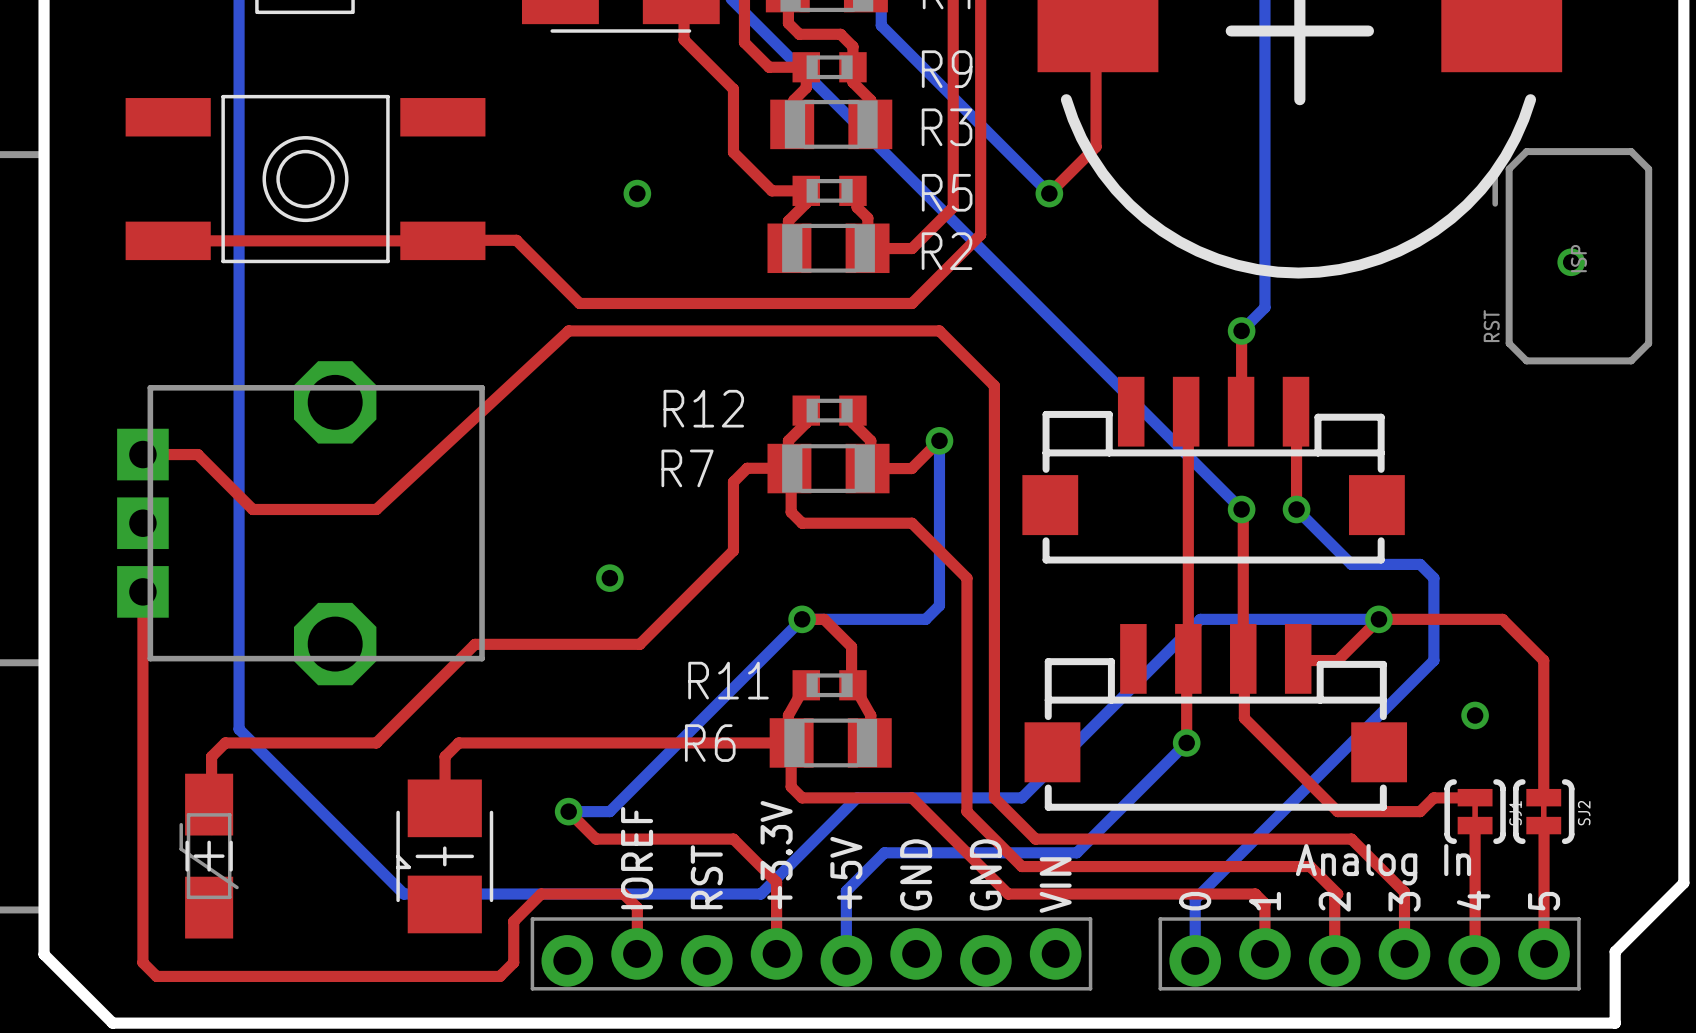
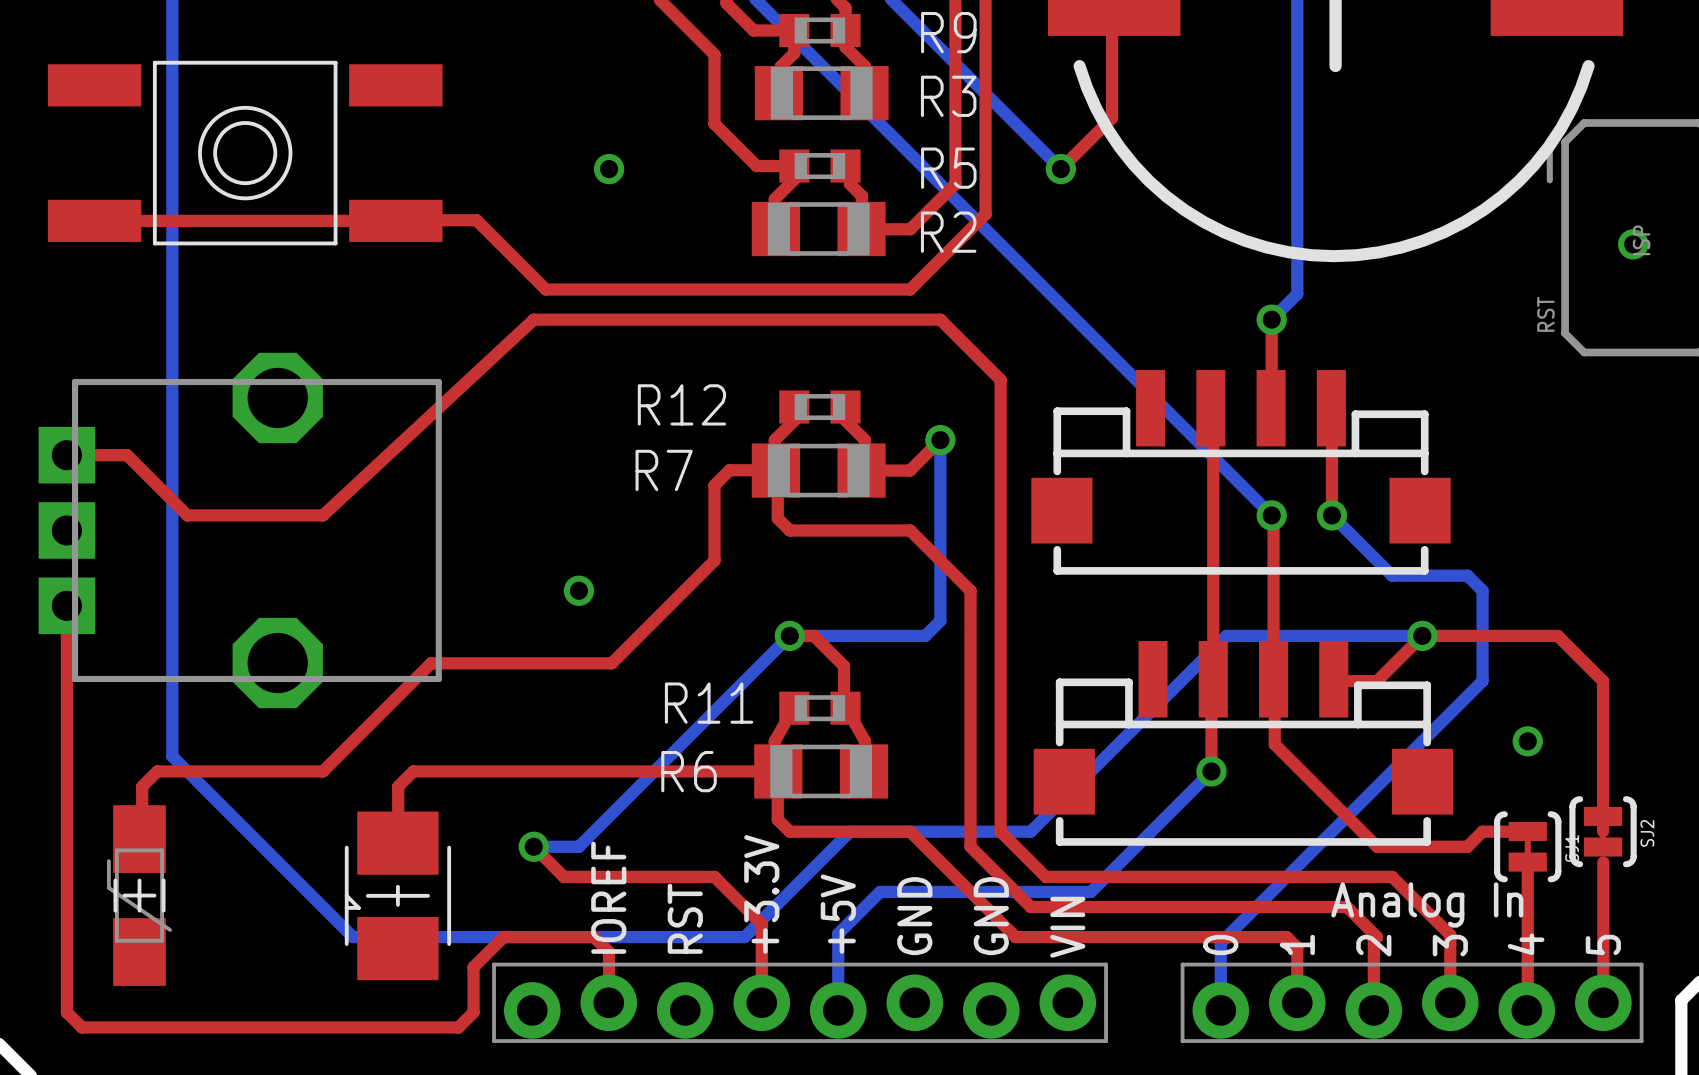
SJ2 position: (1543, 811) -> (1603, 831)

